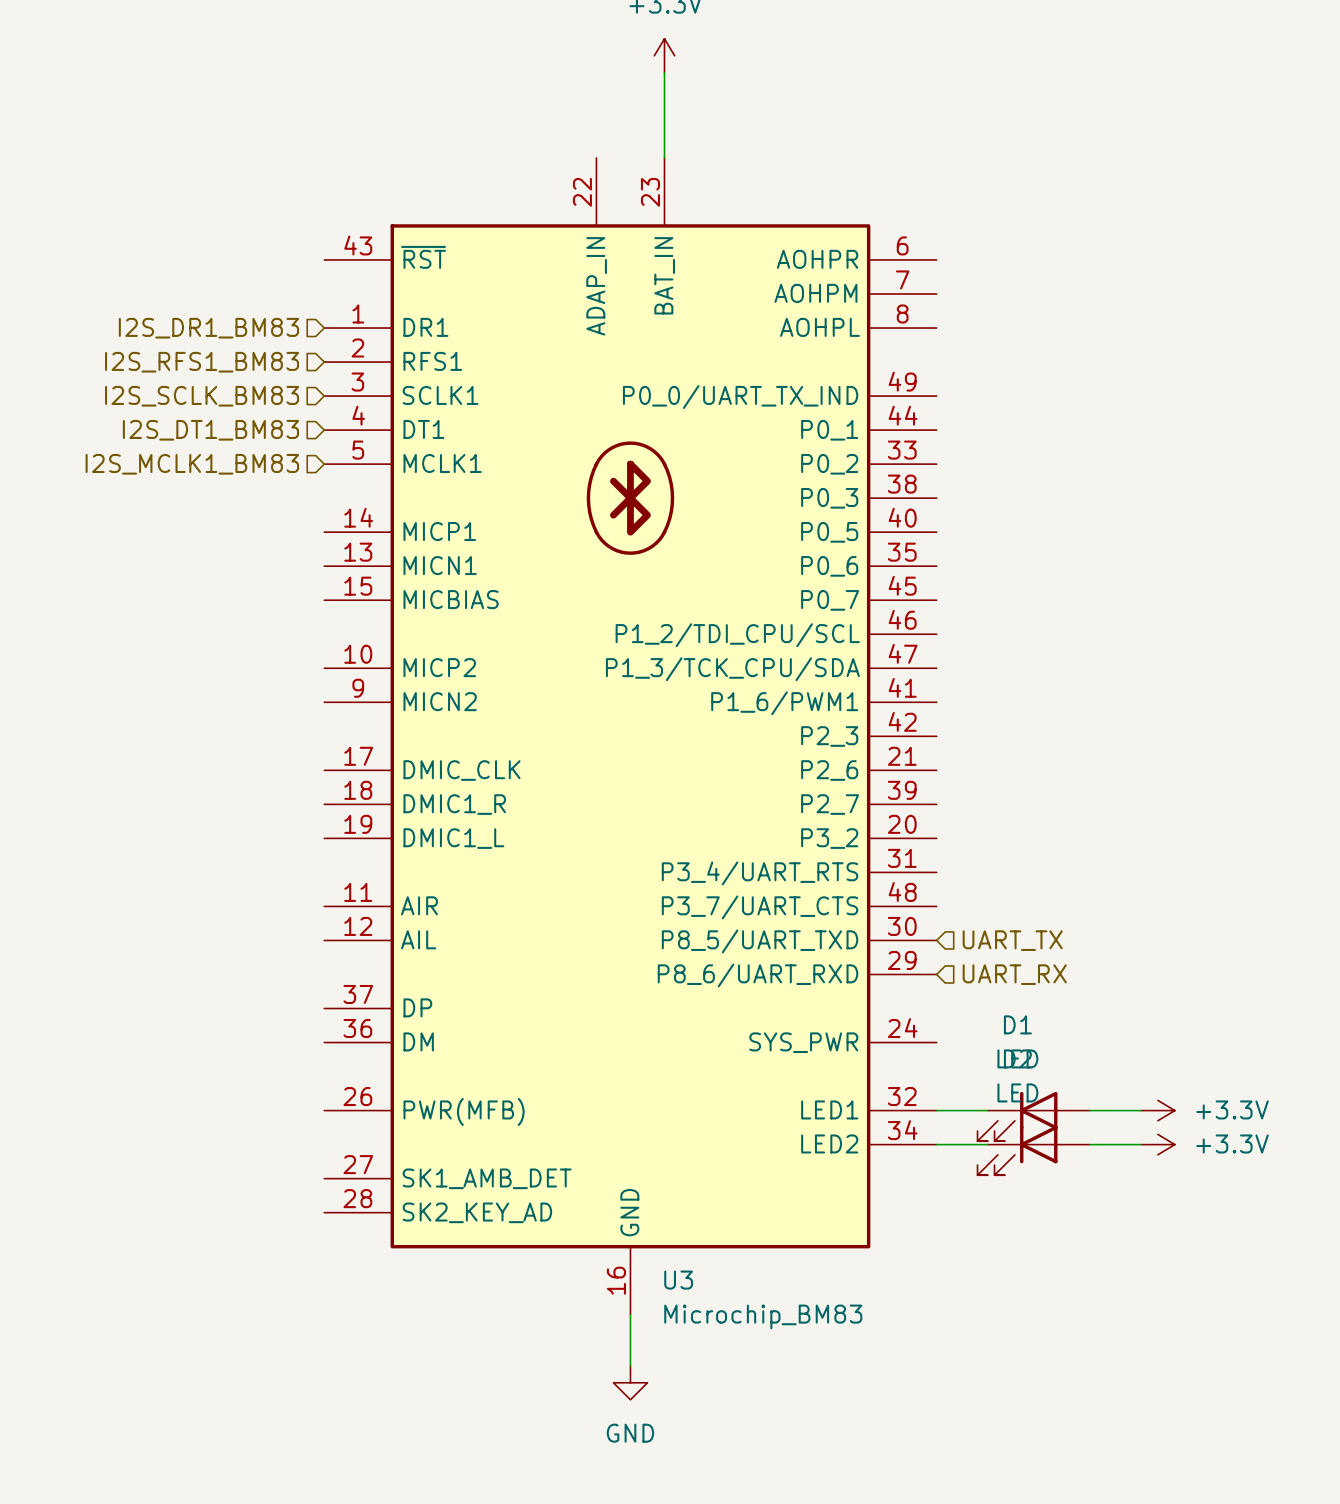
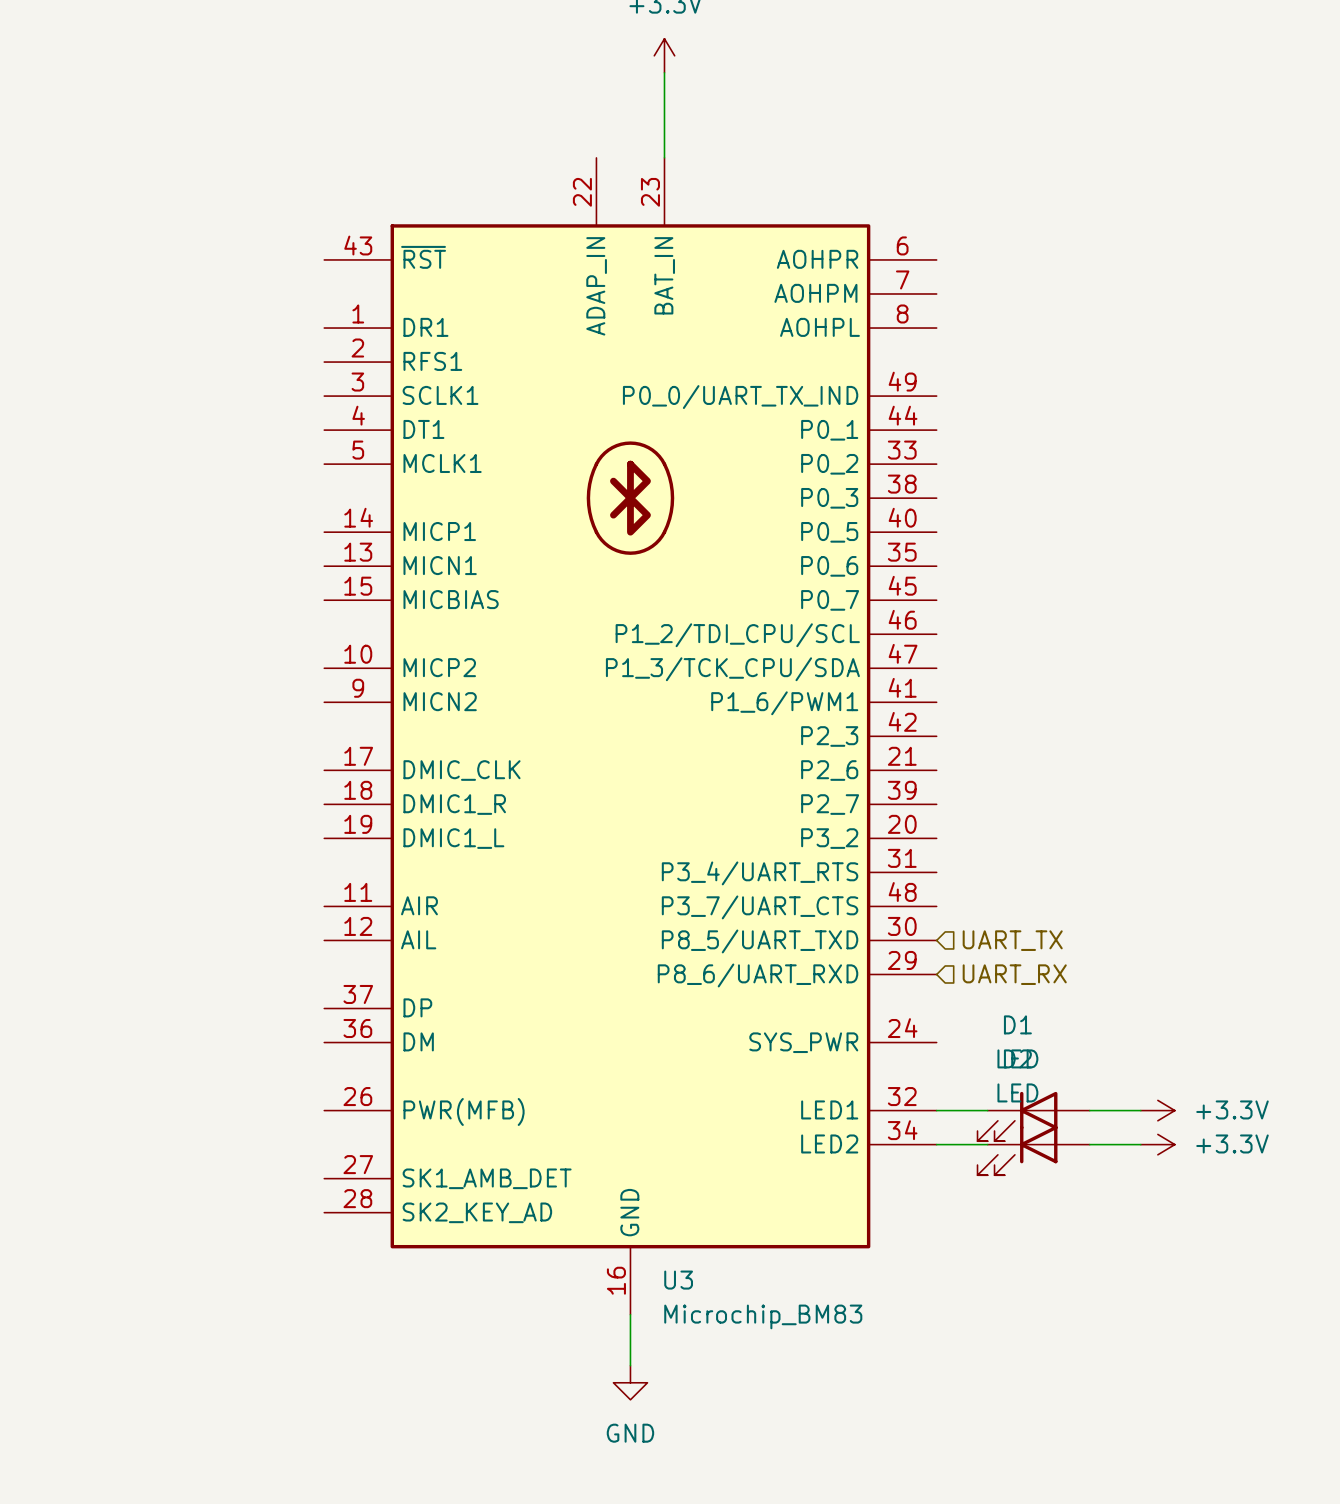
hierarchical label: I2S_DR1_BM83 (208, 328) -> none
hierarchical label: I2S_RFS1_BM83 (202, 362) -> none
hierarchical label: I2S_SCLK_BM83 (202, 396) -> none
hierarchical label: I2S_DT1_BM83 (210, 430) -> none
hierarchical label: I2S_MCLK1_BM83 (192, 464) -> none

